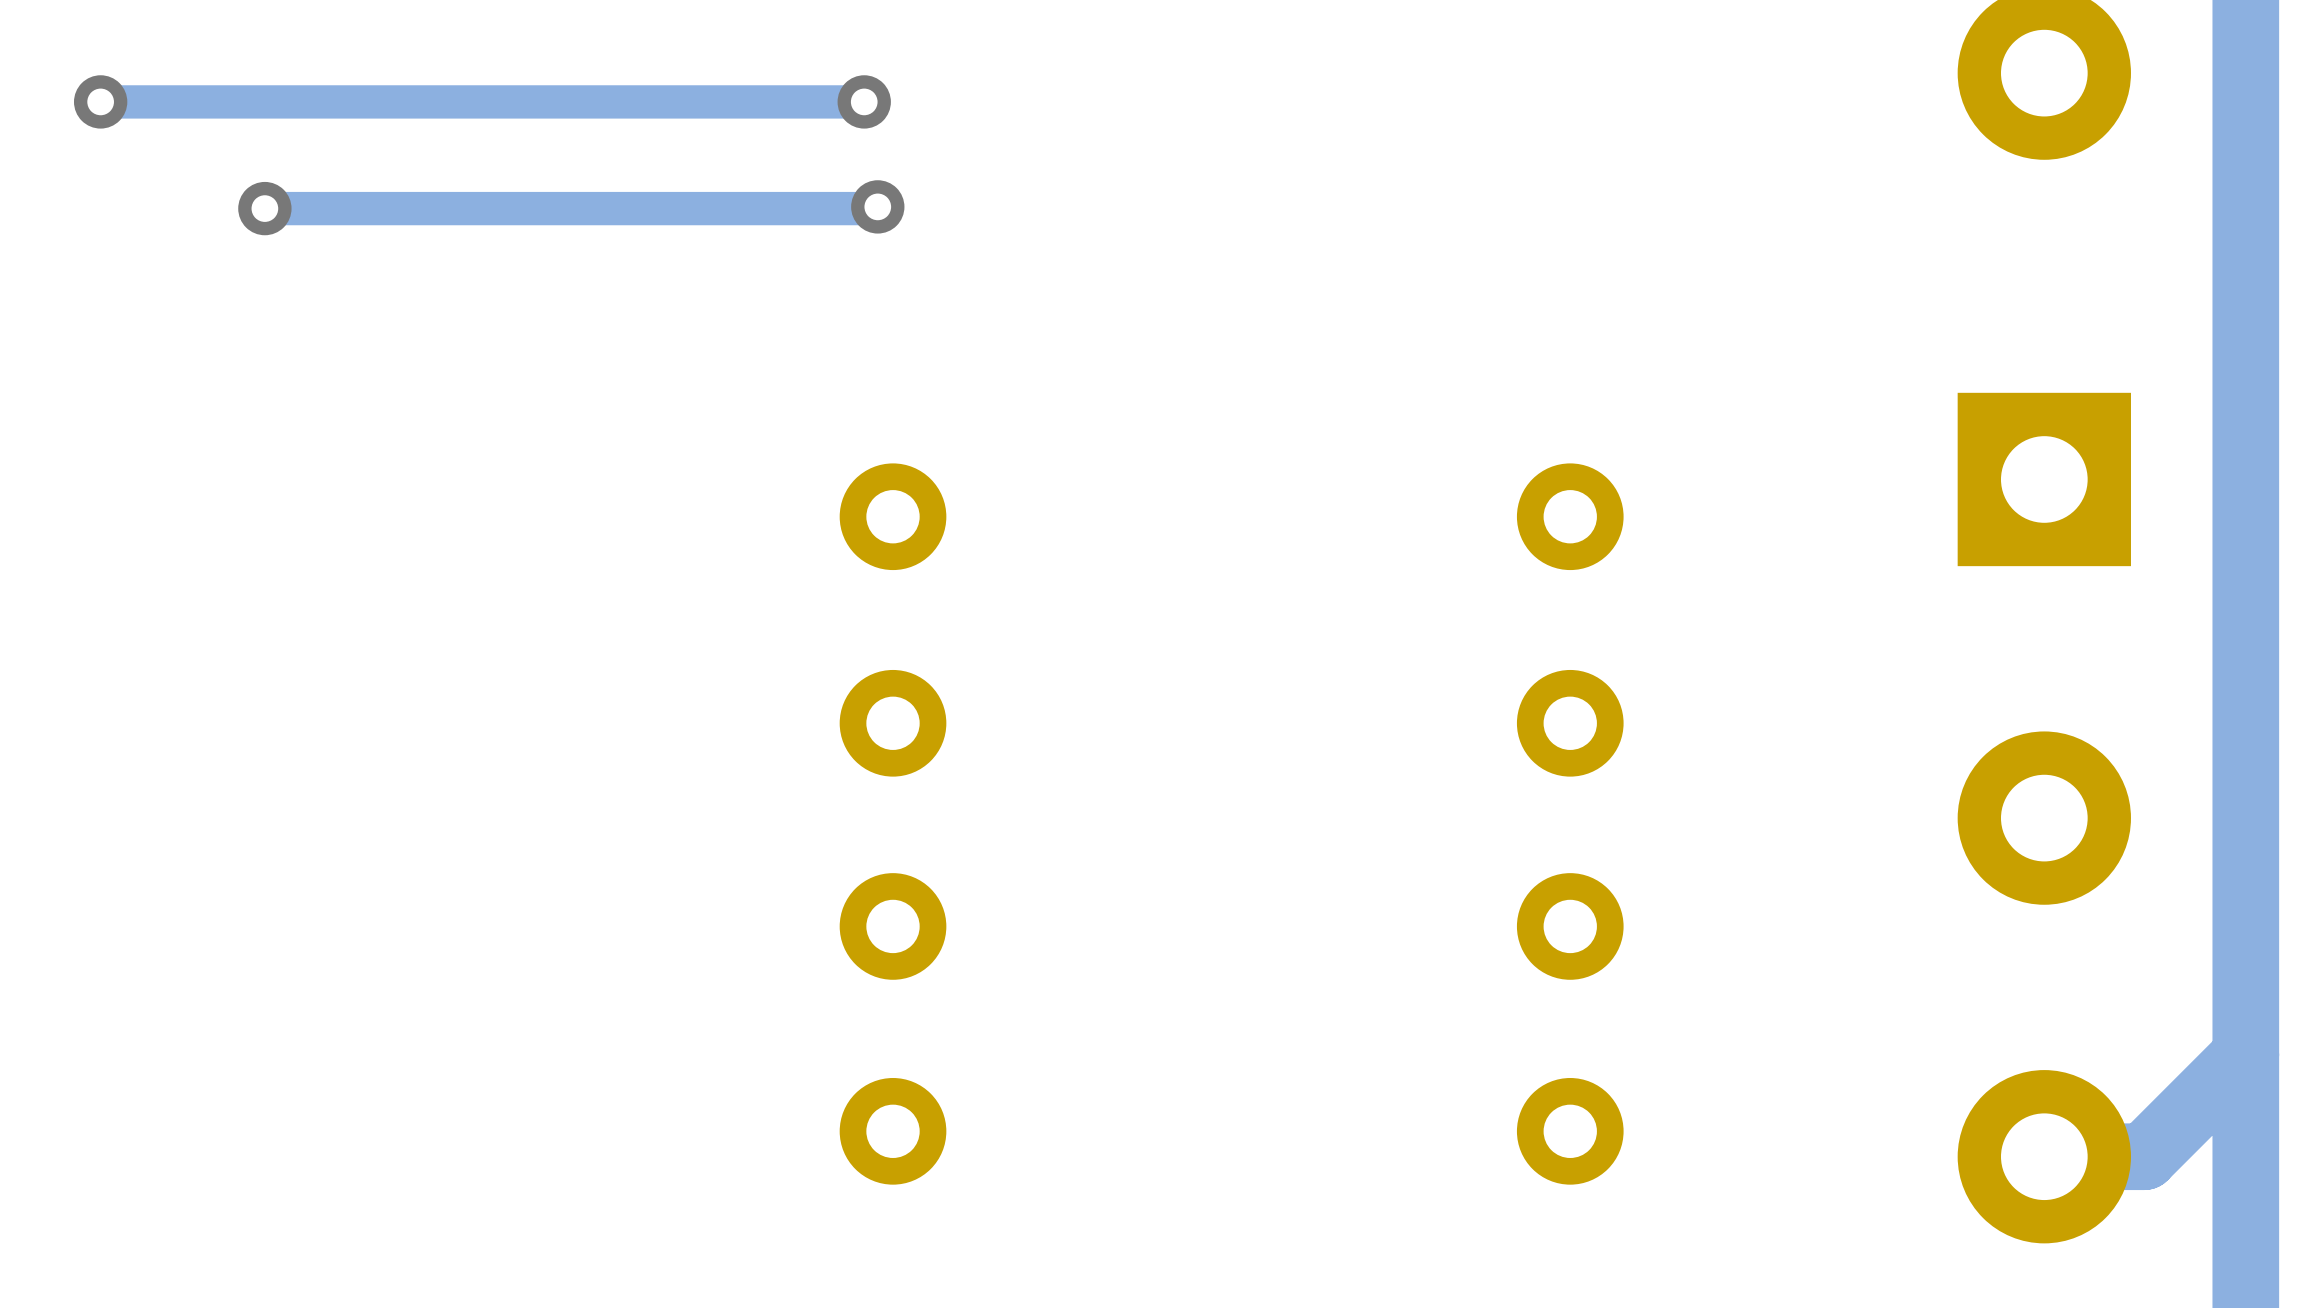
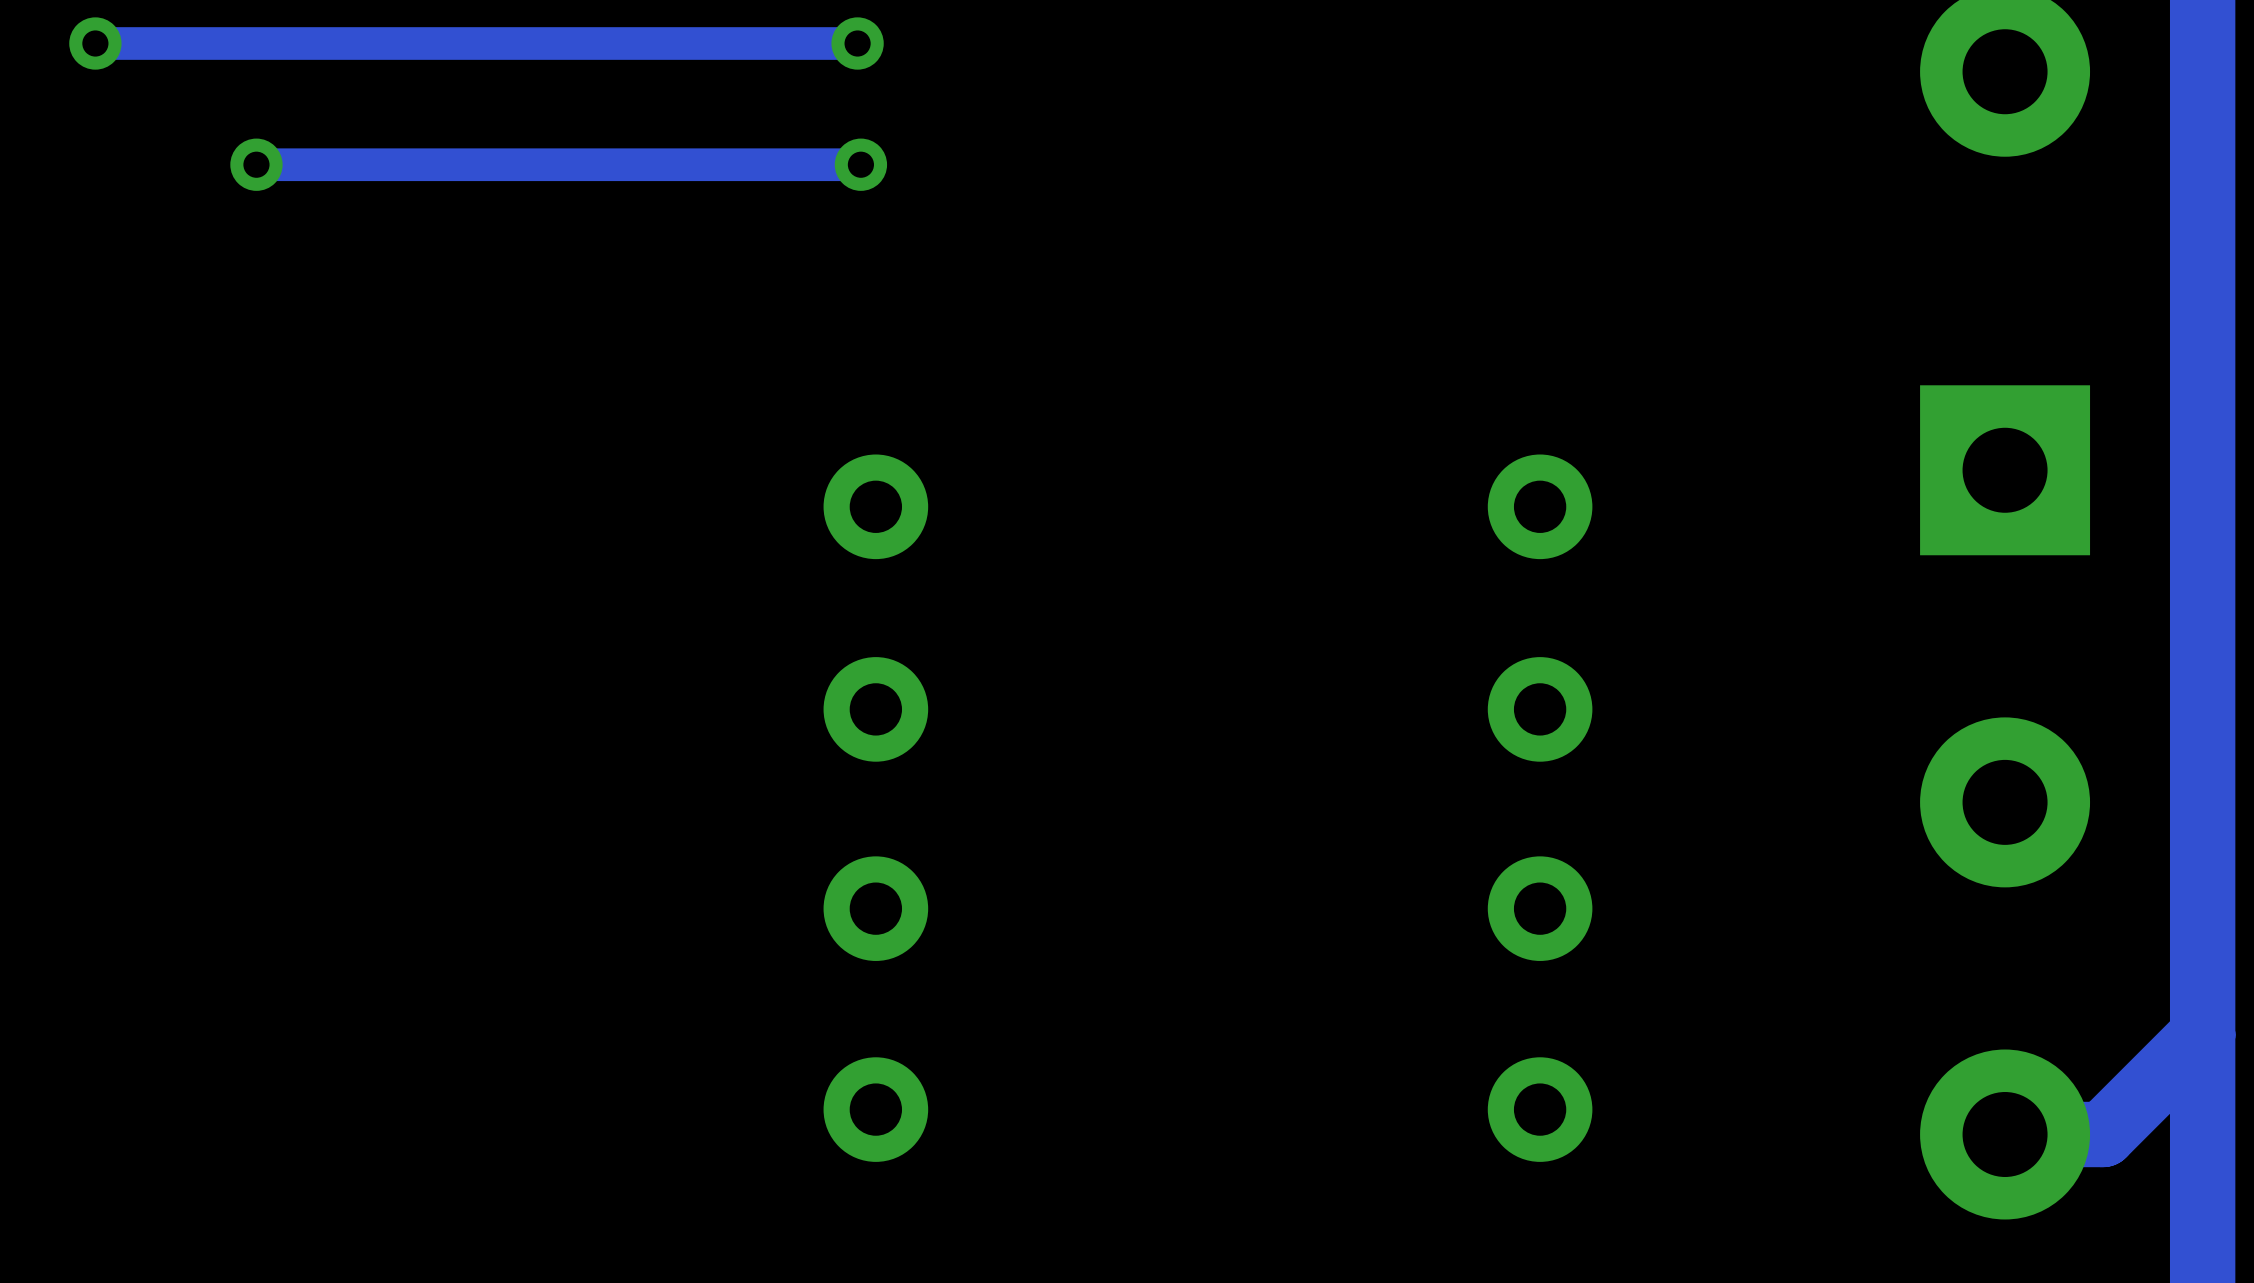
track: none -> (857, 43) (95, 43)
via: none -> (857, 43)
via position: (100, 101) -> (95, 43)
track: (864, 101) (100, 101) -> none
via: (864, 101) -> none
track: none -> (860, 164) (256, 164)
track: (877, 206) (876, 208) (264, 208) -> none
via position: (877, 206) -> (860, 164)
via position: (264, 208) -> (256, 164)

